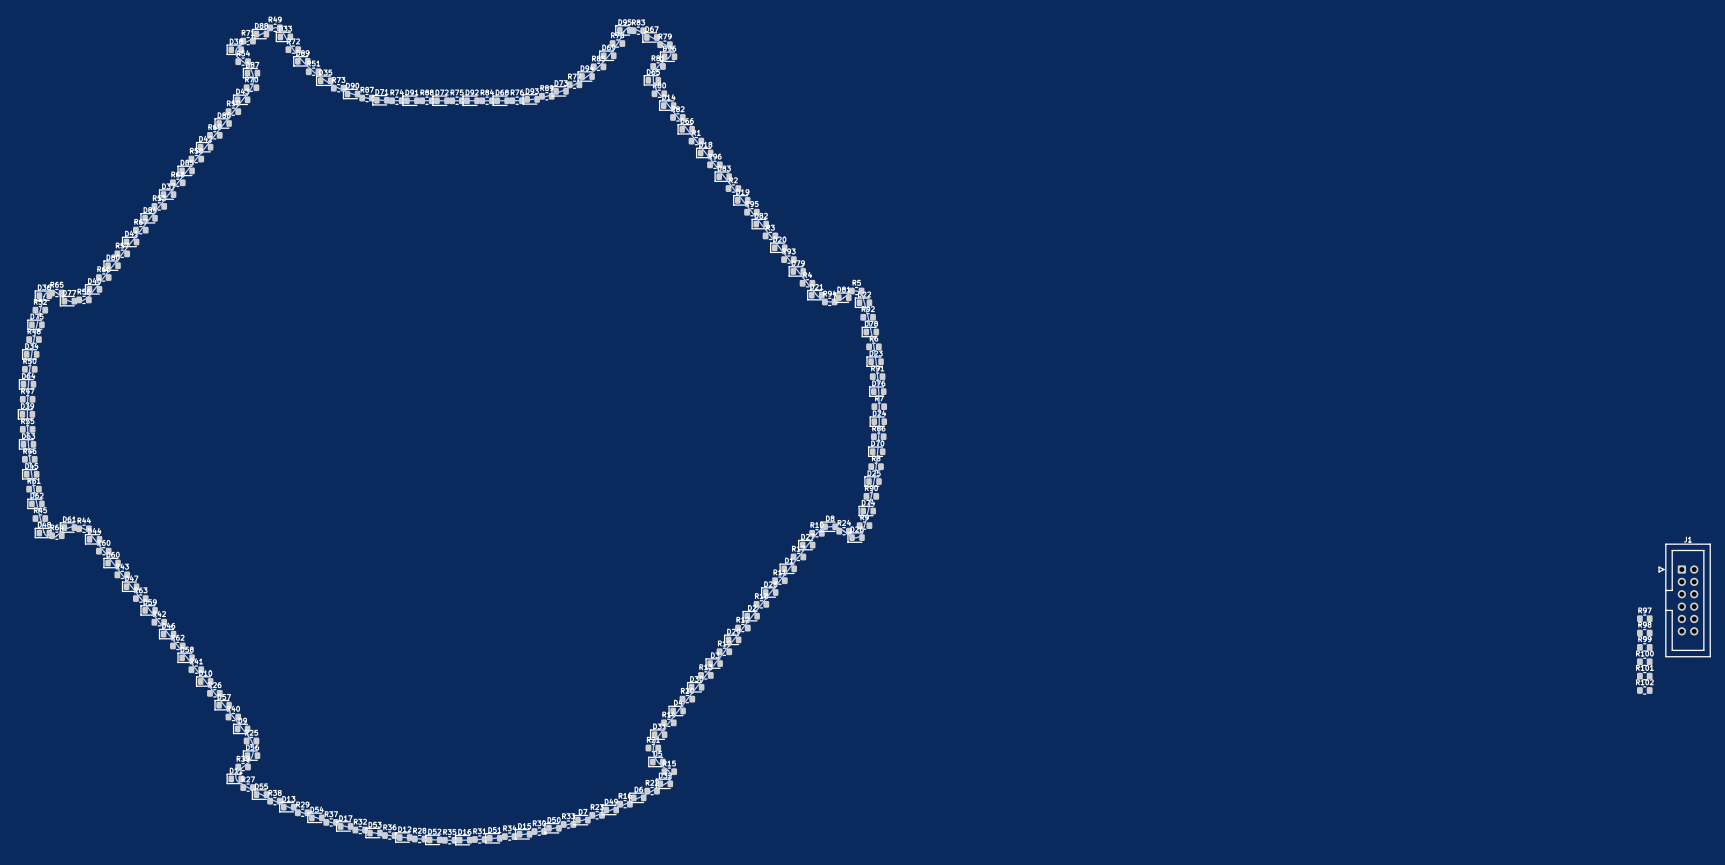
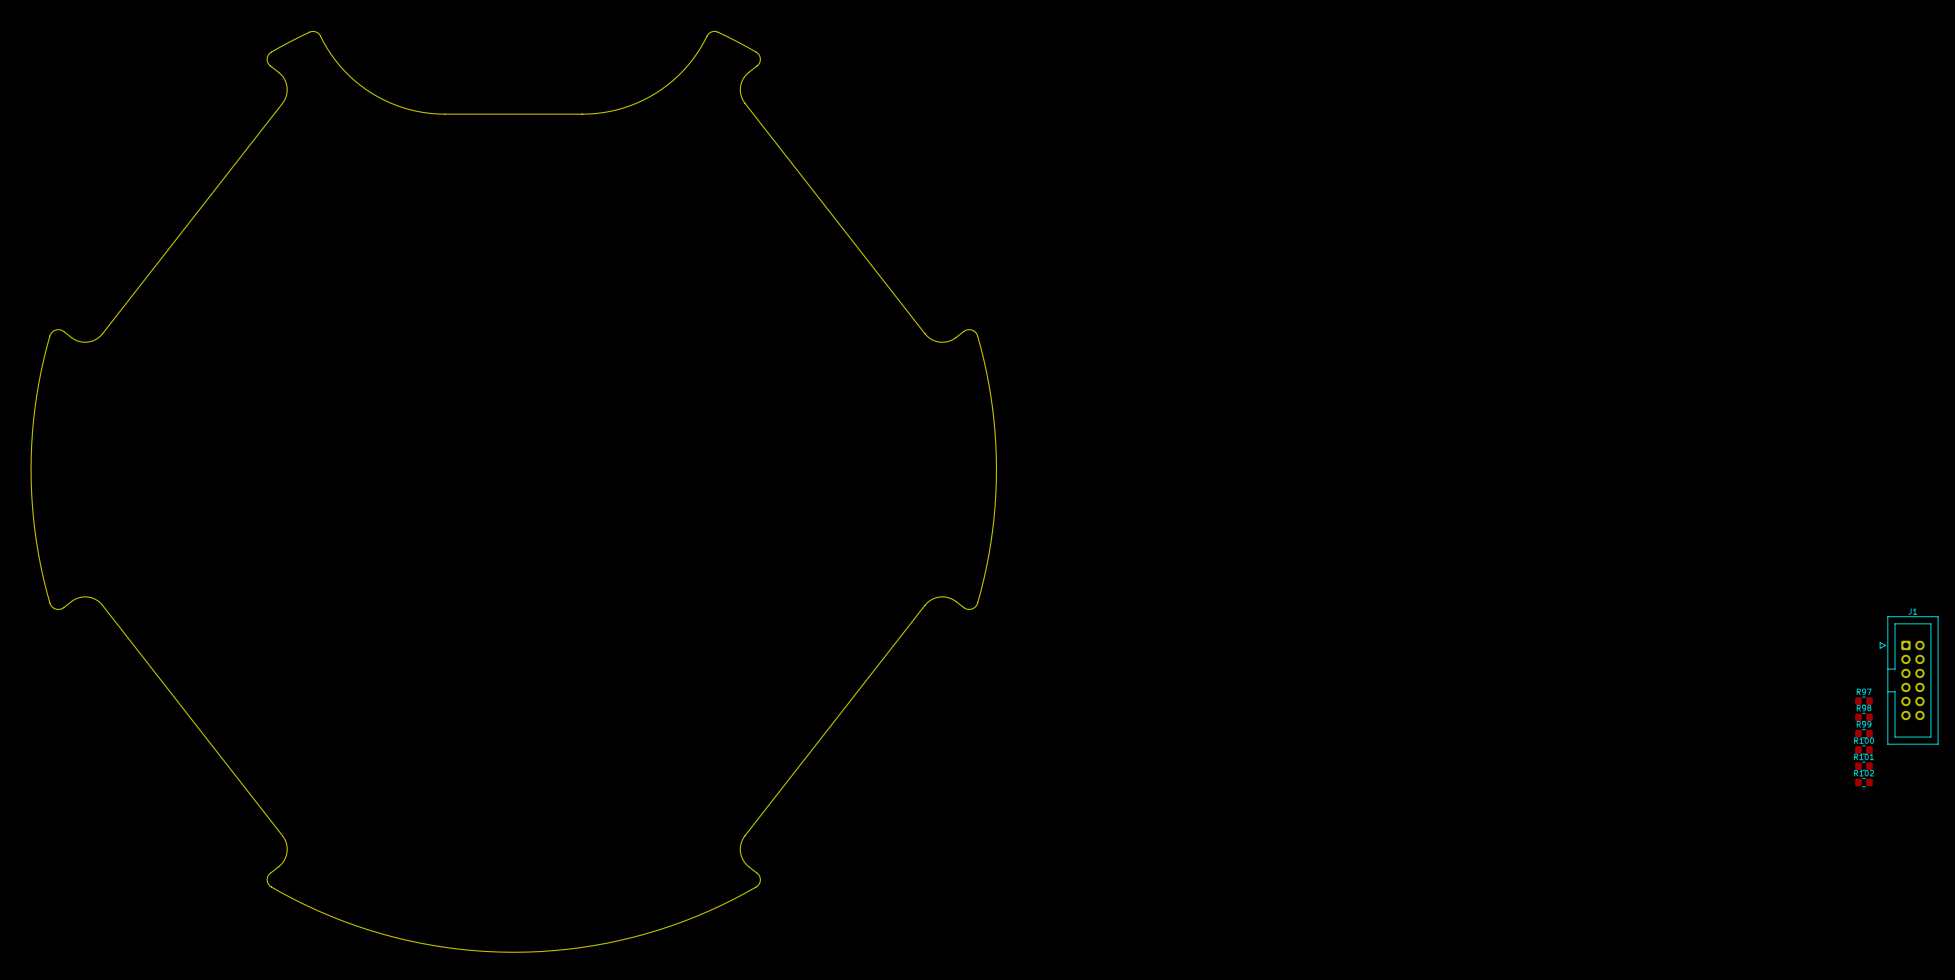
part: (275, 27) -> none
part: (624, 30) -> none
part: (638, 30) -> none
part: (260, 34) -> none
part: (284, 36) -> none
part: (651, 37) -> none
part: (248, 41) -> none
part: (617, 43) -> none
part: (665, 44) -> none
part: (235, 49) -> none
part: (293, 49) -> none
part: (607, 55) -> none
part: (668, 56) -> none
part: (243, 61) -> none
part: (302, 61) -> none
part: (598, 66) -> none
part: (658, 66) -> none
part: (313, 71) -> none
part: (251, 73) -> none
part: (586, 76) -> none
part: (324, 80) -> none
part: (652, 80) -> none
part: (574, 84) -> none
part: (251, 87) -> none
part: (338, 88) -> none
part: (560, 91) -> none
part: (659, 93) -> none
part: (351, 94) -> none
part: (546, 96) -> none
part: (367, 98) -> none
part: (241, 99) -> none
part: (531, 99) -> none
part: (381, 100) -> none
part: (396, 100) -> none
part: (411, 100) -> none
part: (426, 100) -> none
part: (441, 100) -> none
part: (457, 100) -> none
part: (471, 100) -> none
part: (487, 100) -> none
part: (501, 100) -> none
part: (517, 100) -> none
part: (667, 105) -> none
part: (233, 111) -> none
part: (677, 117) -> none
part: (223, 123) -> none
part: (686, 129) -> none
part: (214, 135) -> none
part: (696, 141) -> none
part: (204, 147) -> none
part: (704, 152) -> none
part: (196, 159) -> none
part: (714, 164) -> none
part: (186, 170) -> none
part: (723, 176) -> none
part: (177, 182) -> none
part: (733, 188) -> none
part: (167, 194) -> none
part: (741, 200) -> none
part: (159, 206) -> none
part: (751, 212) -> none
part: (149, 218) -> none
part: (760, 224) -> none
part: (140, 230) -> none
part: (770, 235) -> none
part: (130, 241) -> none
part: (778, 247) -> none
part: (122, 253) -> none
part: (788, 259) -> none
part: (112, 265) -> none
part: (797, 271) -> none
part: (103, 277) -> none
part: (807, 283) -> none
part: (93, 289) -> none
part: (856, 291) -> none
part: (56, 293) -> none
part: (43, 295) -> none
part: (815, 295) -> none
part: (843, 297) -> none
part: (83, 299) -> none
part: (68, 301) -> none
part: (829, 301) -> none
part: (863, 302) -> none
part: (40, 310) -> none
part: (868, 317) -> none
part: (36, 324) -> none
part: (870, 332) -> none
part: (34, 339) -> none
part: (873, 346) -> none
part: (30, 354) -> none
part: (875, 361) -> none
part: (29, 369) -> none
part: (877, 376) -> none
part: (27, 384) -> none
part: (877, 391) -> none
part: (27, 399) -> none
part: (879, 406) -> none
part: (26, 414) -> none
part: (878, 421) -> none
part: (27, 429) -> none
part: (878, 436) -> none
part: (27, 444) -> none
part: (876, 451) -> none
part: (29, 459) -> none
part: (876, 466) -> none
part: (30, 474) -> none
part: (873, 481) -> none
part: (34, 489) -> none
part: (871, 496) -> none
part: (36, 503) -> none
part: (867, 511) -> none
part: (40, 518) -> none
part: (864, 525) -> none
part: (829, 526) -> none
part: (68, 527) -> none
part: (83, 528) -> none
part: (844, 531) -> none
part: (43, 533) -> none
part: (816, 533) -> none
part: (56, 535) -> none
part: (856, 537) -> none
part: (93, 539) -> none
part: (806, 545) -> none
part: (103, 551) -> none
part: (798, 556) -> none
part: (112, 563) -> none
part: (788, 568) -> none
part: (122, 574) -> none
part: (779, 580) -> none
part: (130, 586) -> none
part: (769, 592) -> none
part: (140, 598) -> none
part: (761, 604) -> none
part: (149, 610) -> none
part: (751, 616) -> none
part: (159, 622) -> none
part: (742, 628) -> none
part: (167, 634) -> none
part: (732, 639) -> none
part: (177, 645) -> none
part: (724, 651) -> none
part: (186, 657) -> none
part: (714, 663) -> none
part: (196, 669) -> none
part: (705, 675) -> none
part: (204, 681) -> none
part: (695, 687) -> none
part: (214, 693) -> none
part: (687, 699) -> none
part: (223, 705) -> none
part: (677, 710) -> none
part: (233, 717) -> none
part: (668, 722) -> none
part: (241, 728) -> none
part: (658, 734) -> none
part: (251, 740) -> none
part: (653, 748) -> none
part: (251, 755) -> none
part: (657, 761) -> none
part: (243, 767) -> none
part: (669, 771) -> none
part: (235, 778) -> none
part: (664, 783) -> none
part: (248, 787) -> none
part: (652, 791) -> none
part: (260, 794) -> none
part: (637, 797) -> none
part: (274, 801) -> none
part: (625, 804) -> none
part: (287, 807) -> none
part: (610, 809) -> none
part: (302, 812) -> none
part: (597, 815) -> none
part: (316, 817) -> none
part: (582, 820) -> none
part: (331, 822) -> none
part: (568, 824) -> none
part: (344, 826) -> none
part: (553, 828) -> none
part: (360, 830) -> none
part: (539, 831) -> none
part: (374, 833) -> none
part: (523, 834) -> none
part: (389, 835) -> none
part: (509, 836) -> none
part: (403, 837) -> none
part: (419, 838) -> none
part: (493, 838) -> none
part: (433, 839) -> none
part: (479, 839) -> none
part: (449, 840) -> none
part: (463, 840) -> none

